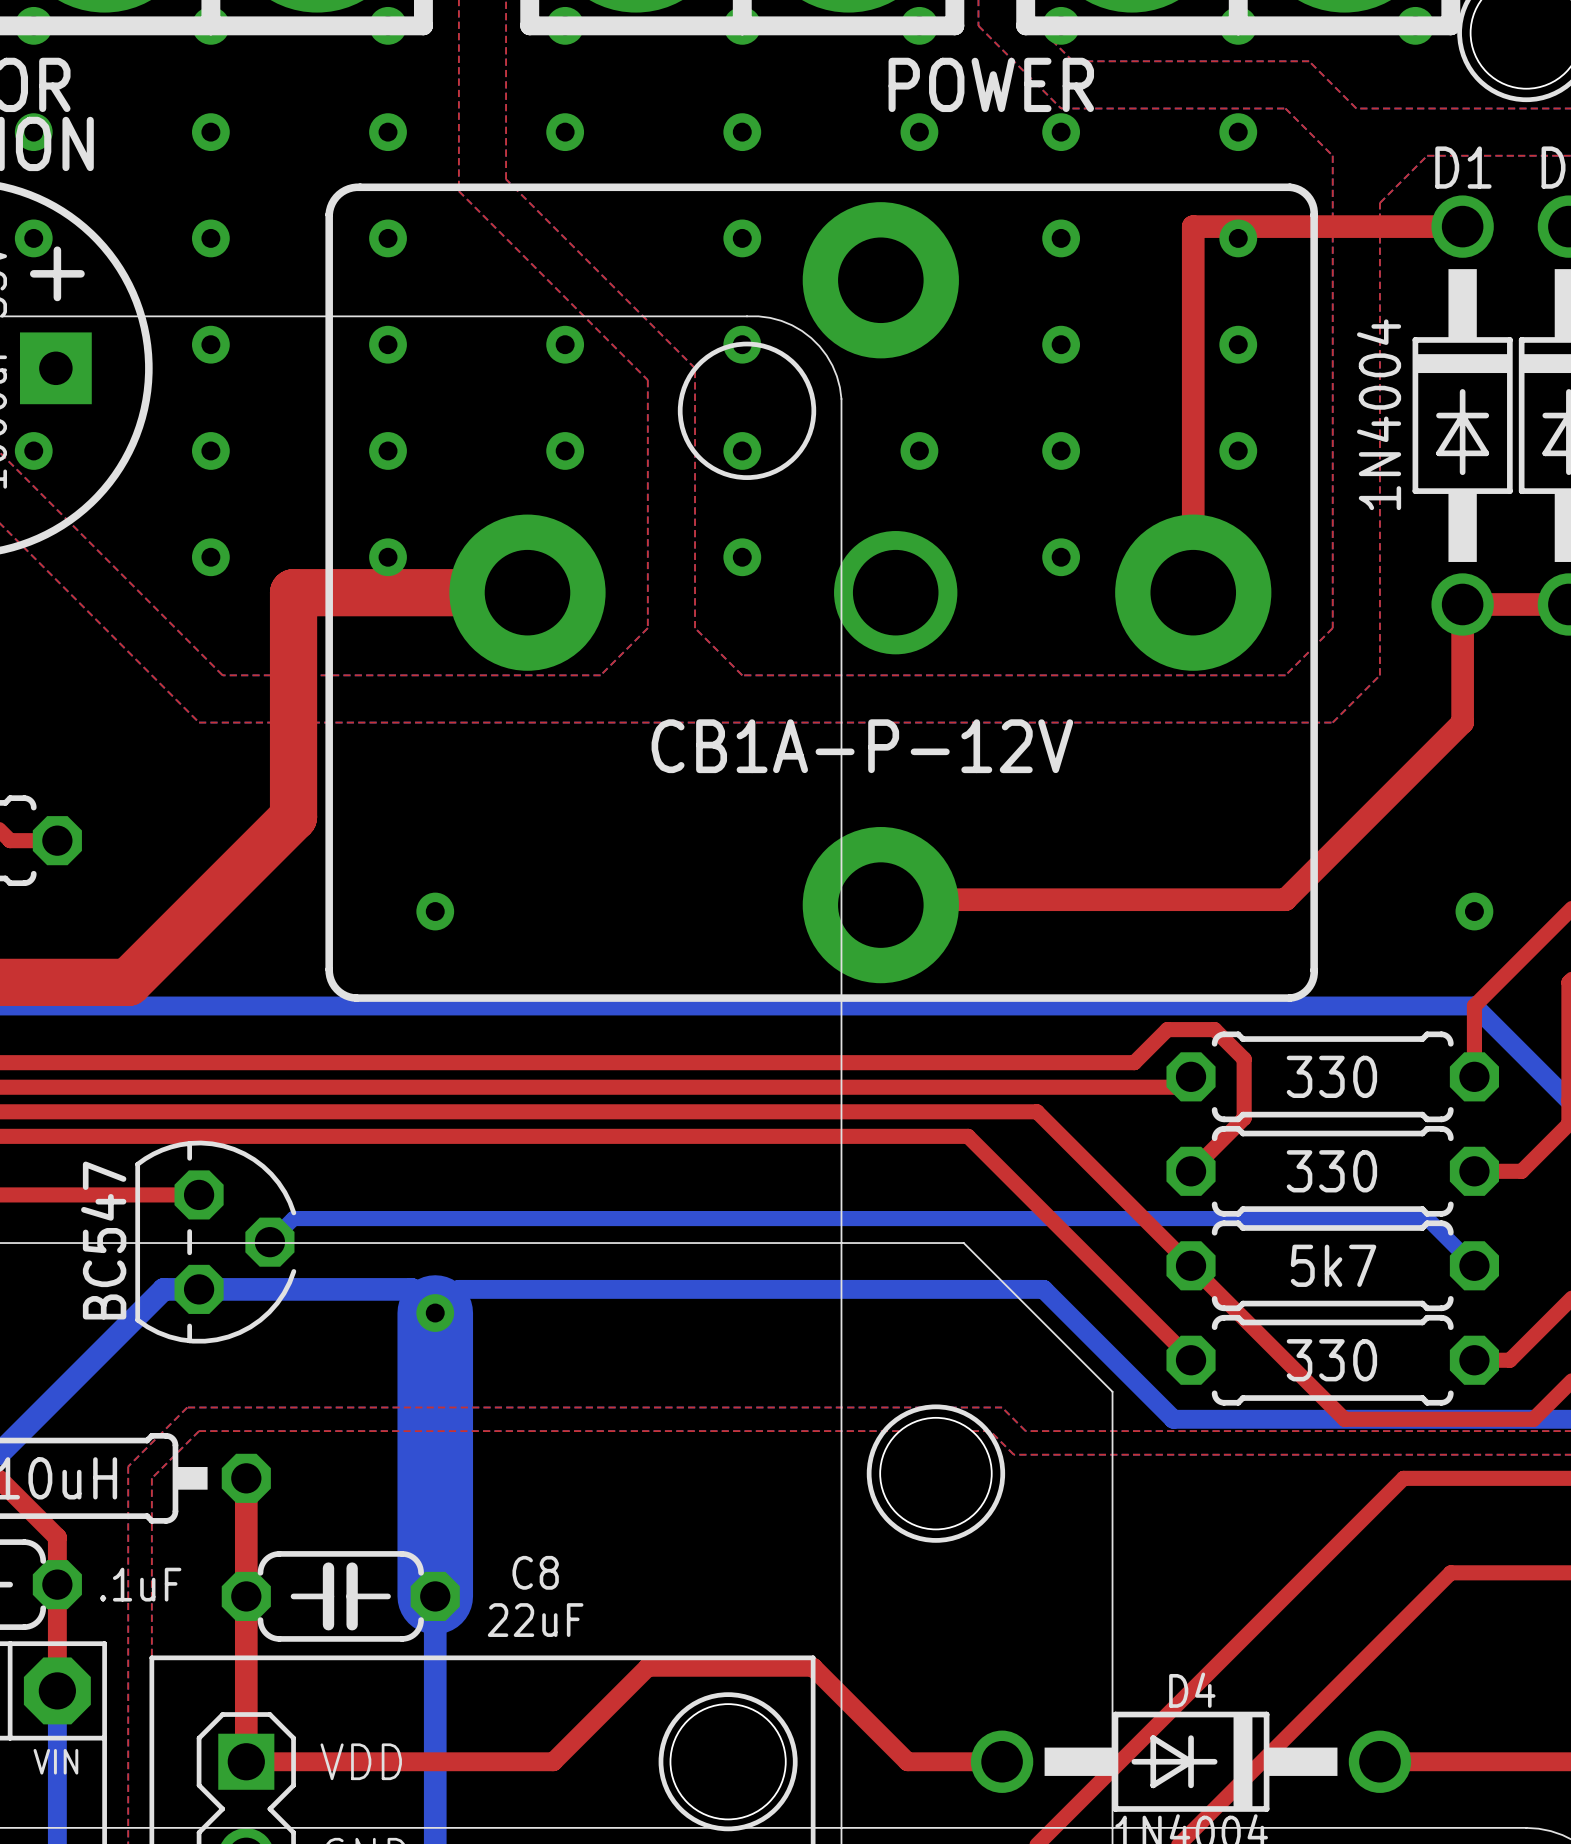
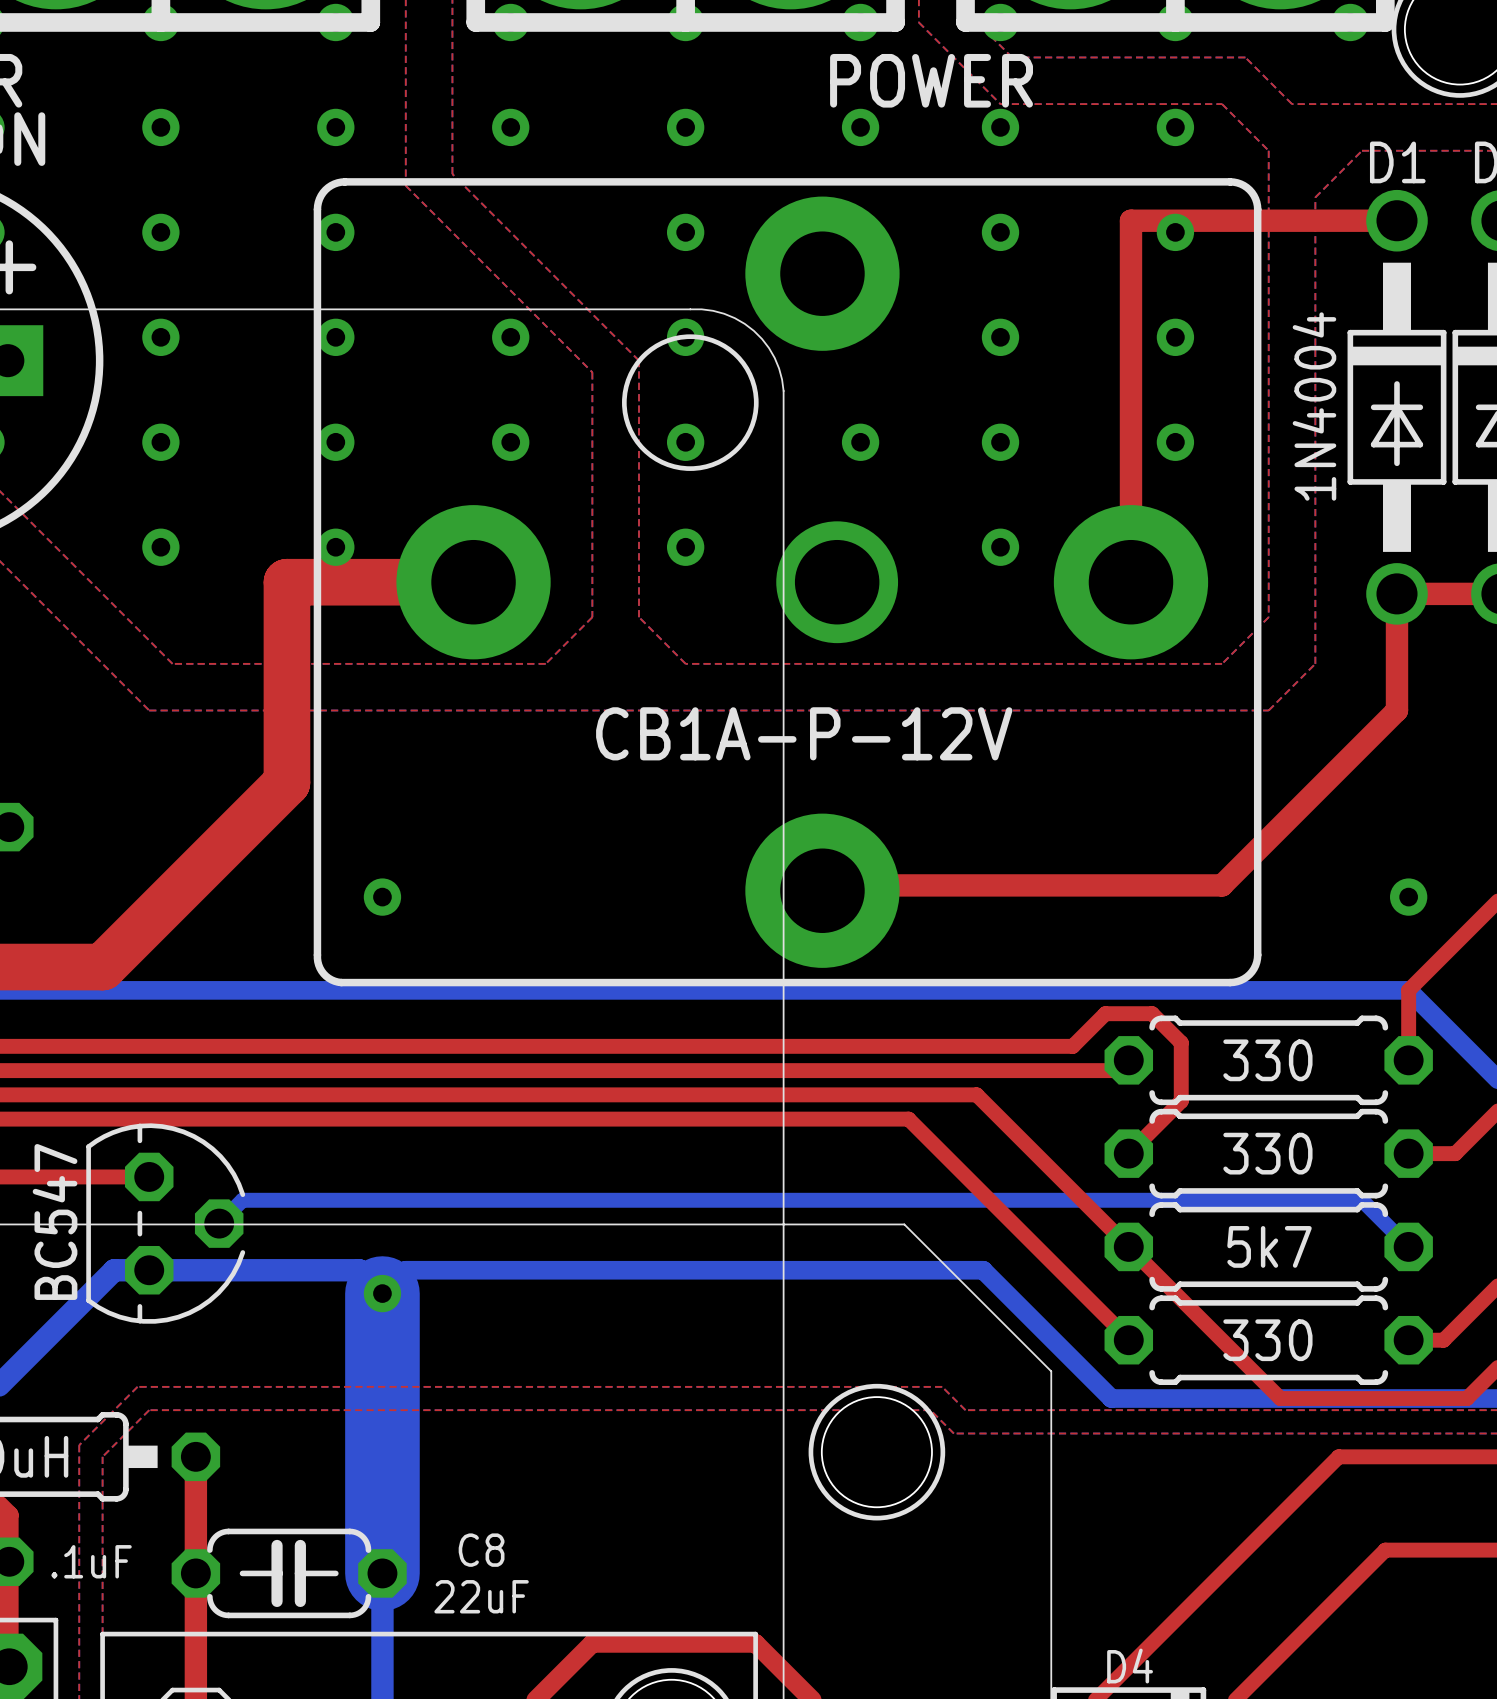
part footprint: [325, 183, 1318, 1002] -> [313, 178, 1262, 987]
top track: (338, 592) (293, 592) (293, 817) (128, 982) -> (286, 582) (286, 782) (102, 967) (79, 967)

